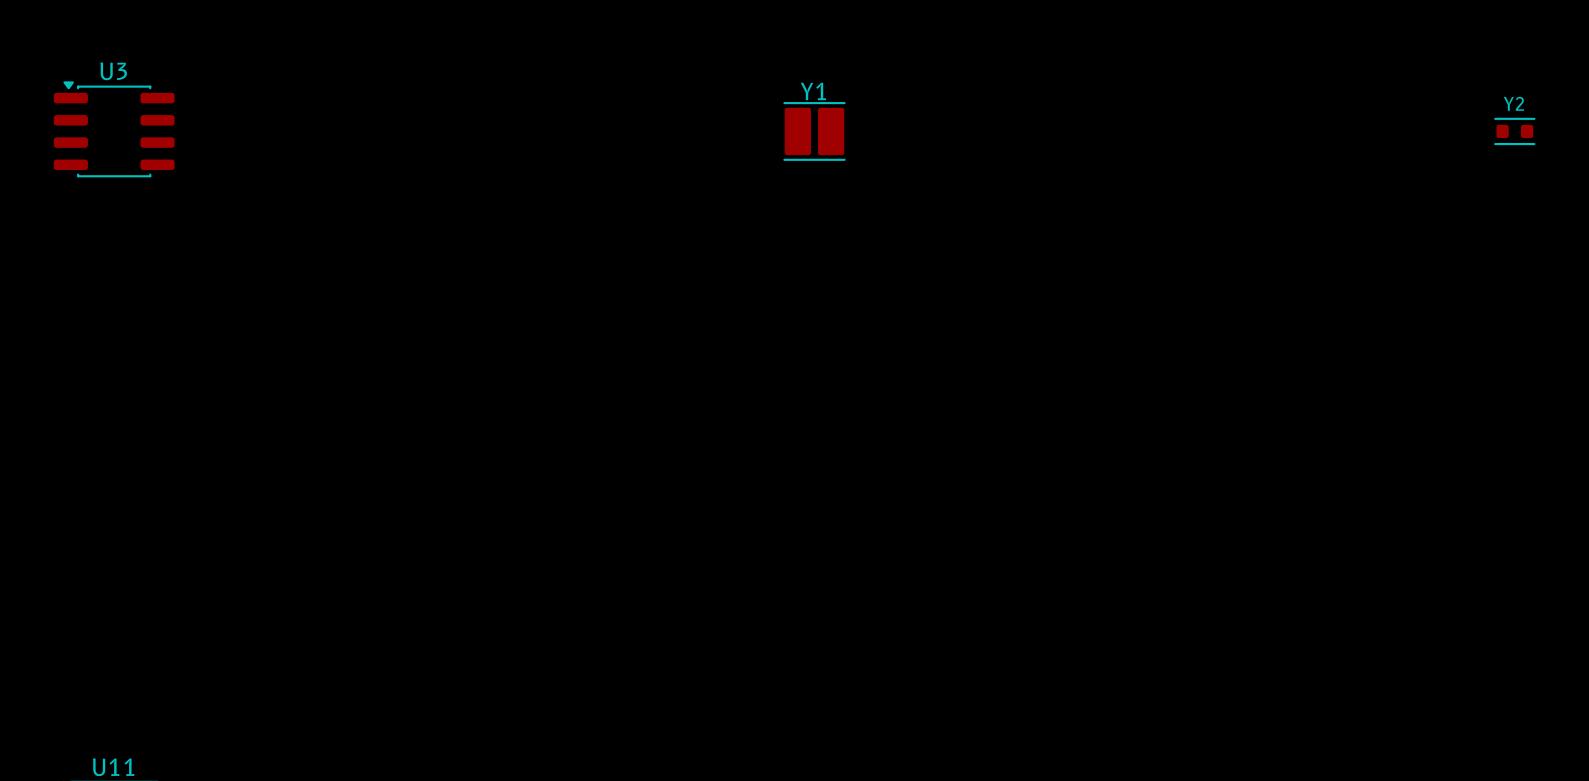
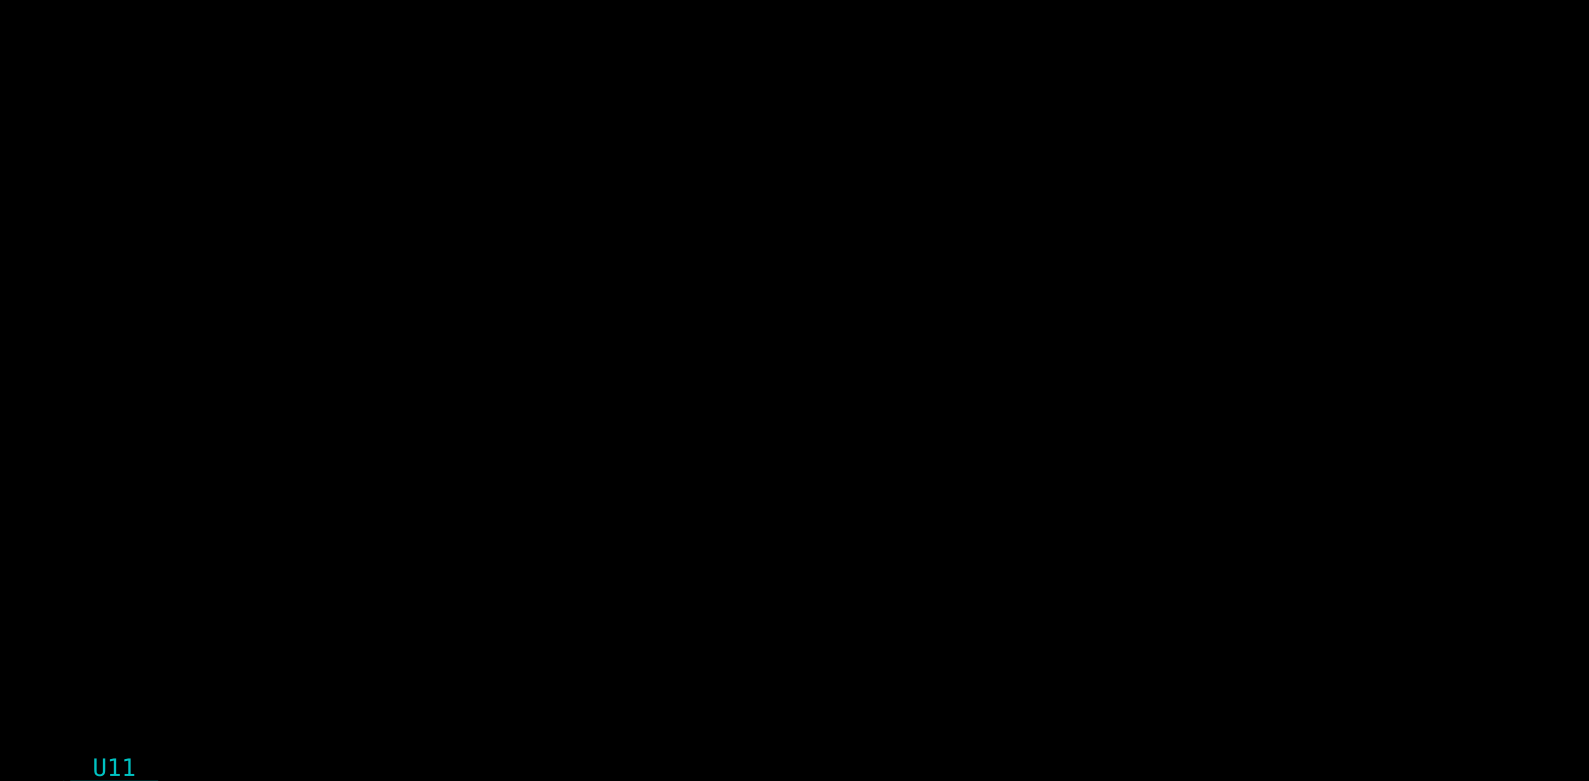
U3: (114, 129) -> none
Y1: (814, 131) -> none
Y2: (1514, 131) -> none

